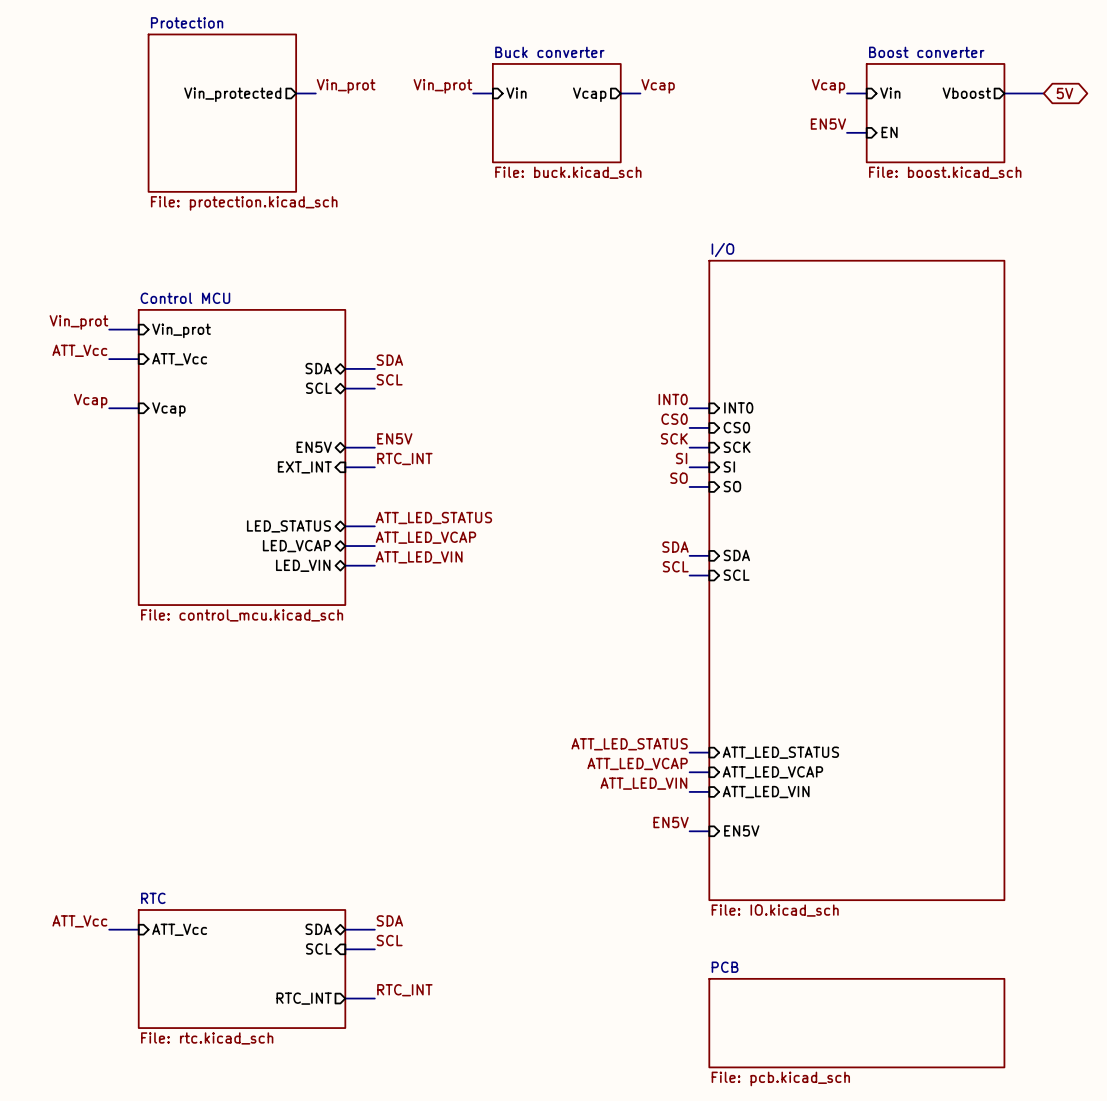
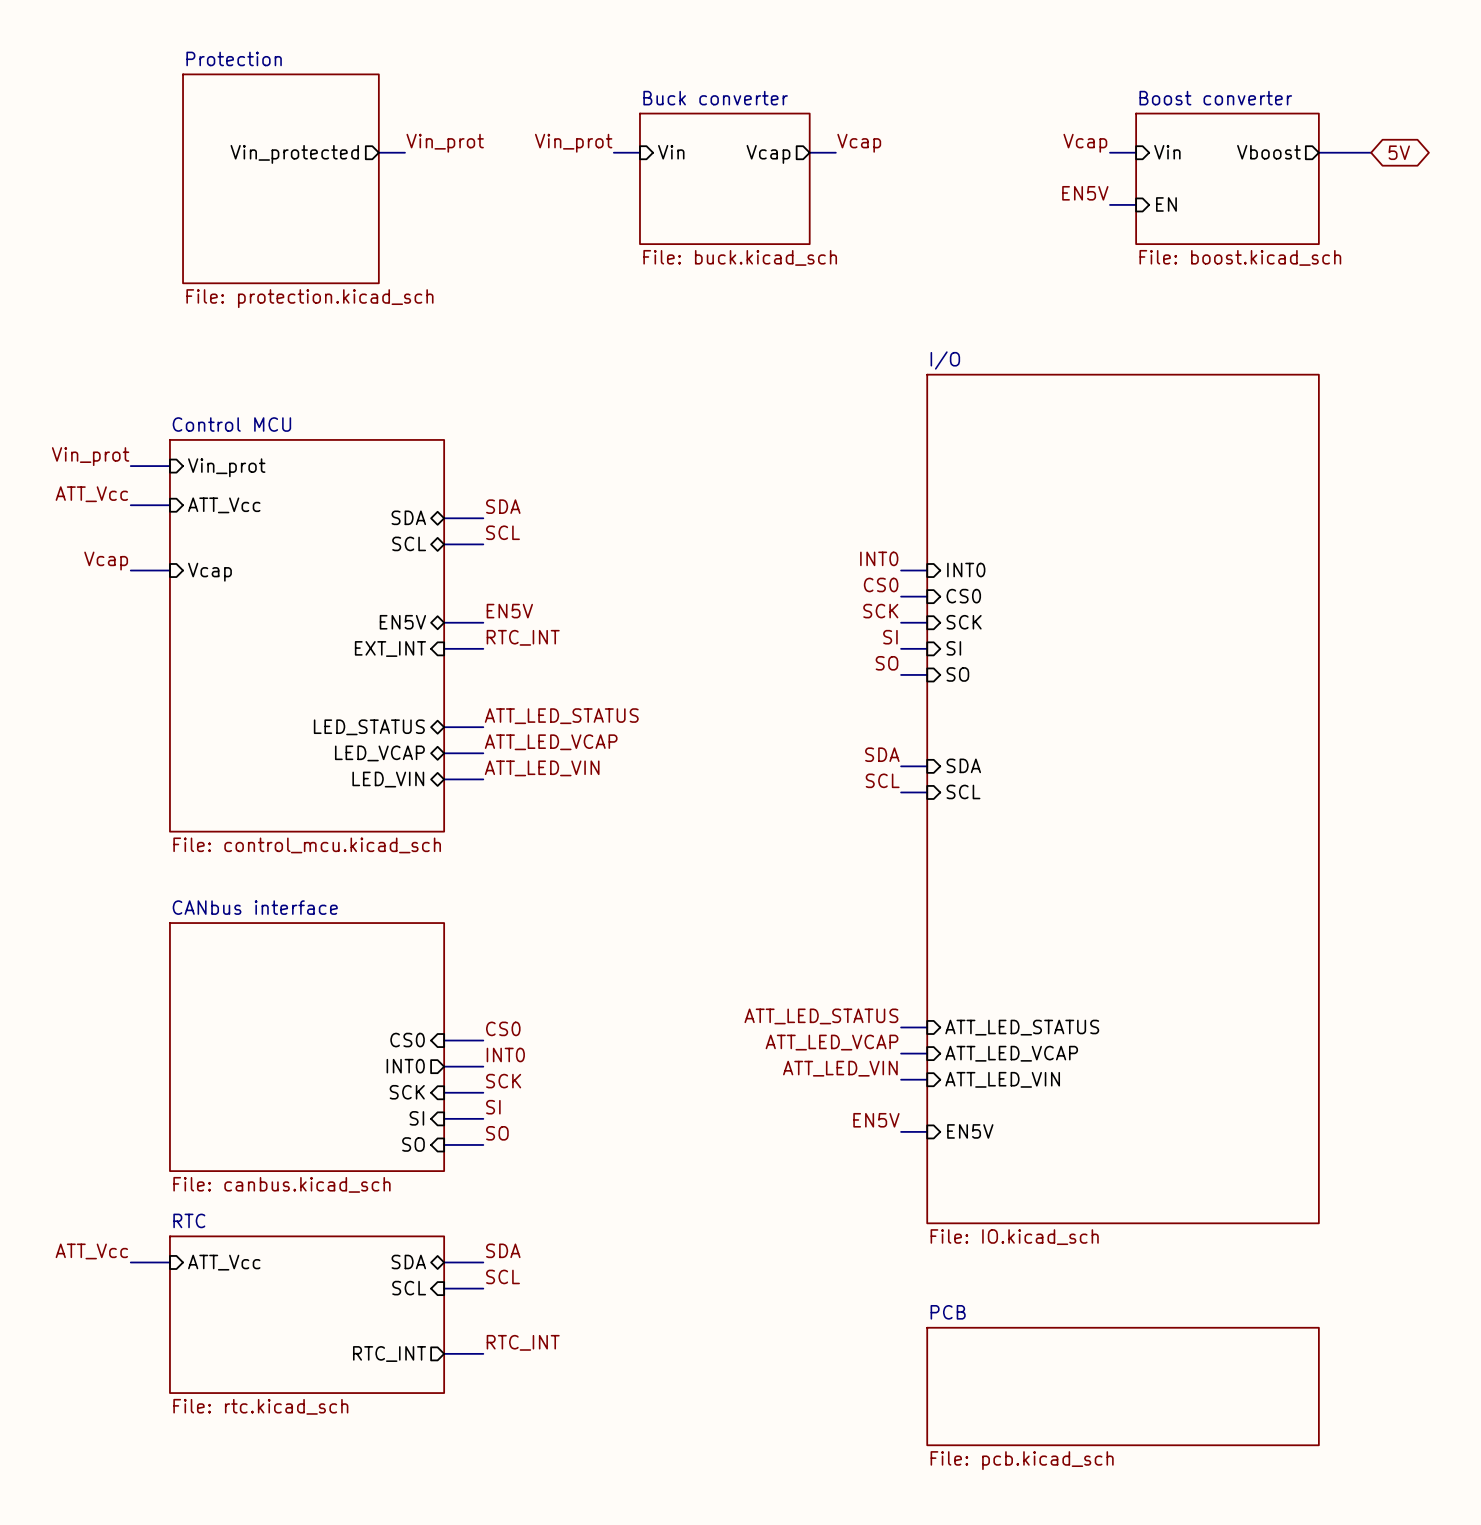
label: none -> CS0 (503, 1028)
sheet pin: none -> CS0 (407, 1040)
wire: none -> (444, 1040) (483, 1040)
sheet CANbus interface: none -> File: canbus.kicad_sch (307, 1047)
label: none -> INT0 (505, 1054)
sheet pin: none -> INT0 (405, 1066)
wire: none -> (444, 1066) (483, 1066)
label: none -> SCK (503, 1081)
sheet pin: none -> SCK (407, 1092)
wire: none -> (444, 1092) (483, 1092)
label: none -> SI (493, 1107)
sheet pin: none -> SI (416, 1118)
wire: none -> (444, 1118) (483, 1118)
label: none -> SO (497, 1133)
sheet pin: none -> SO (413, 1144)
wire: none -> (444, 1144) (483, 1144)

